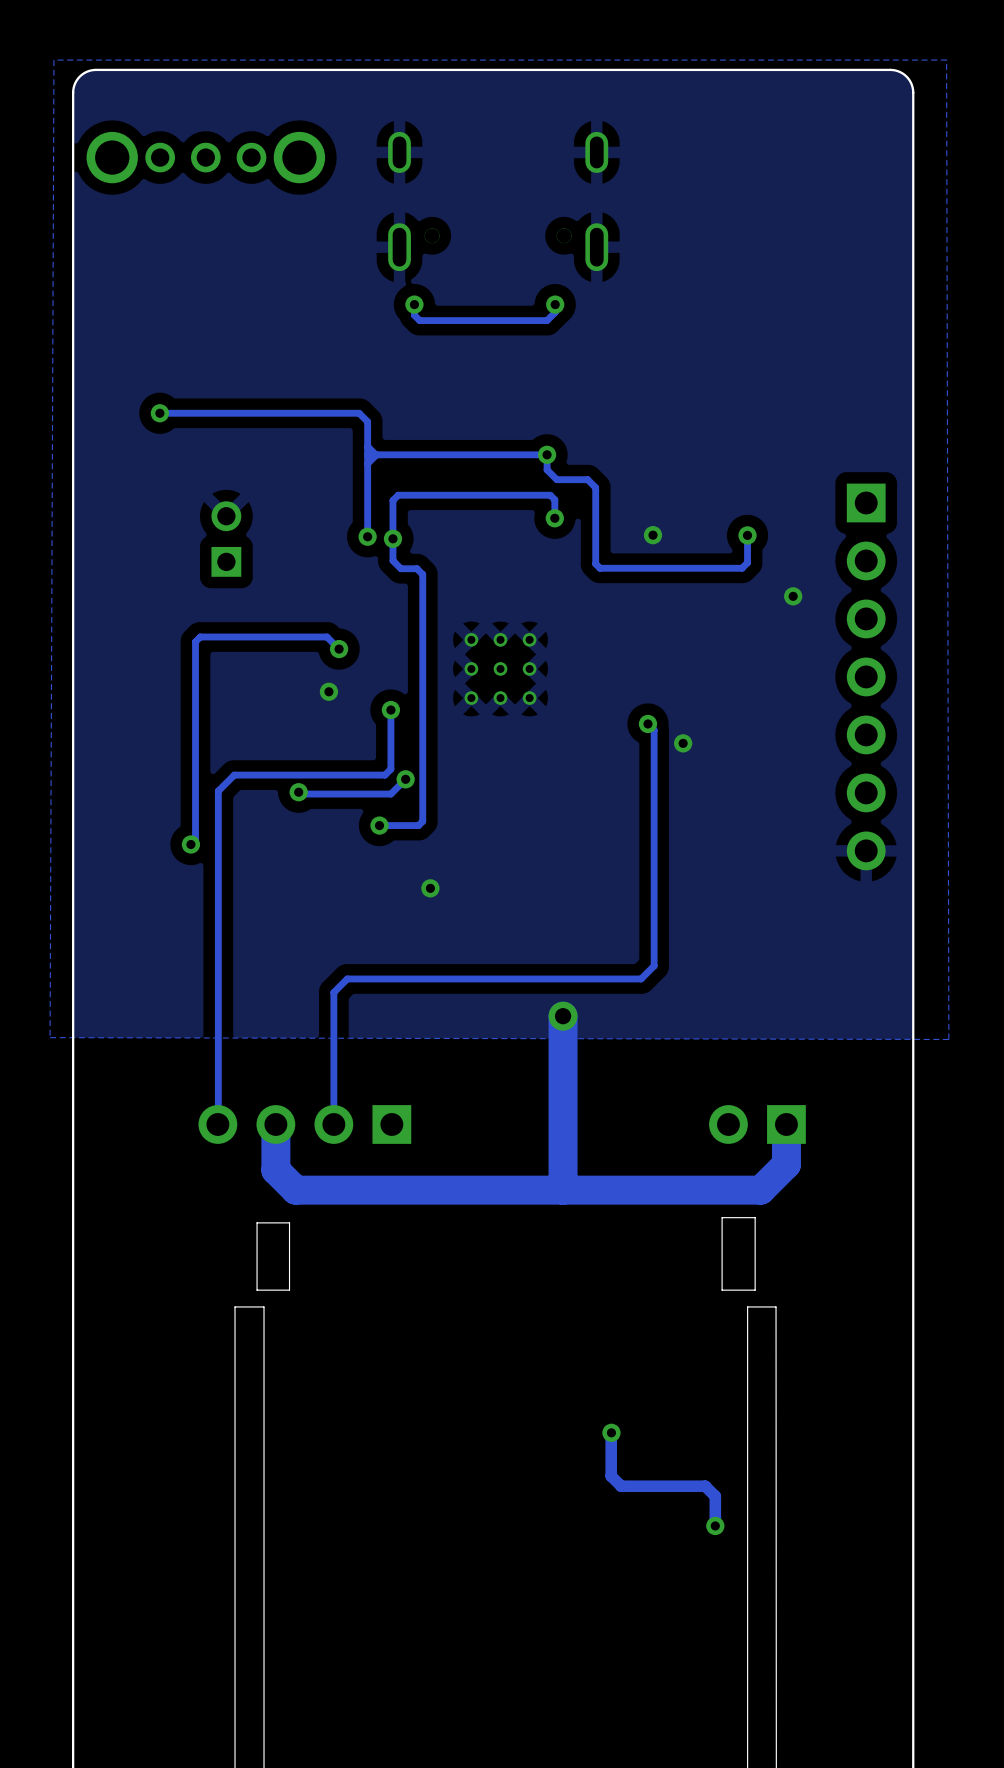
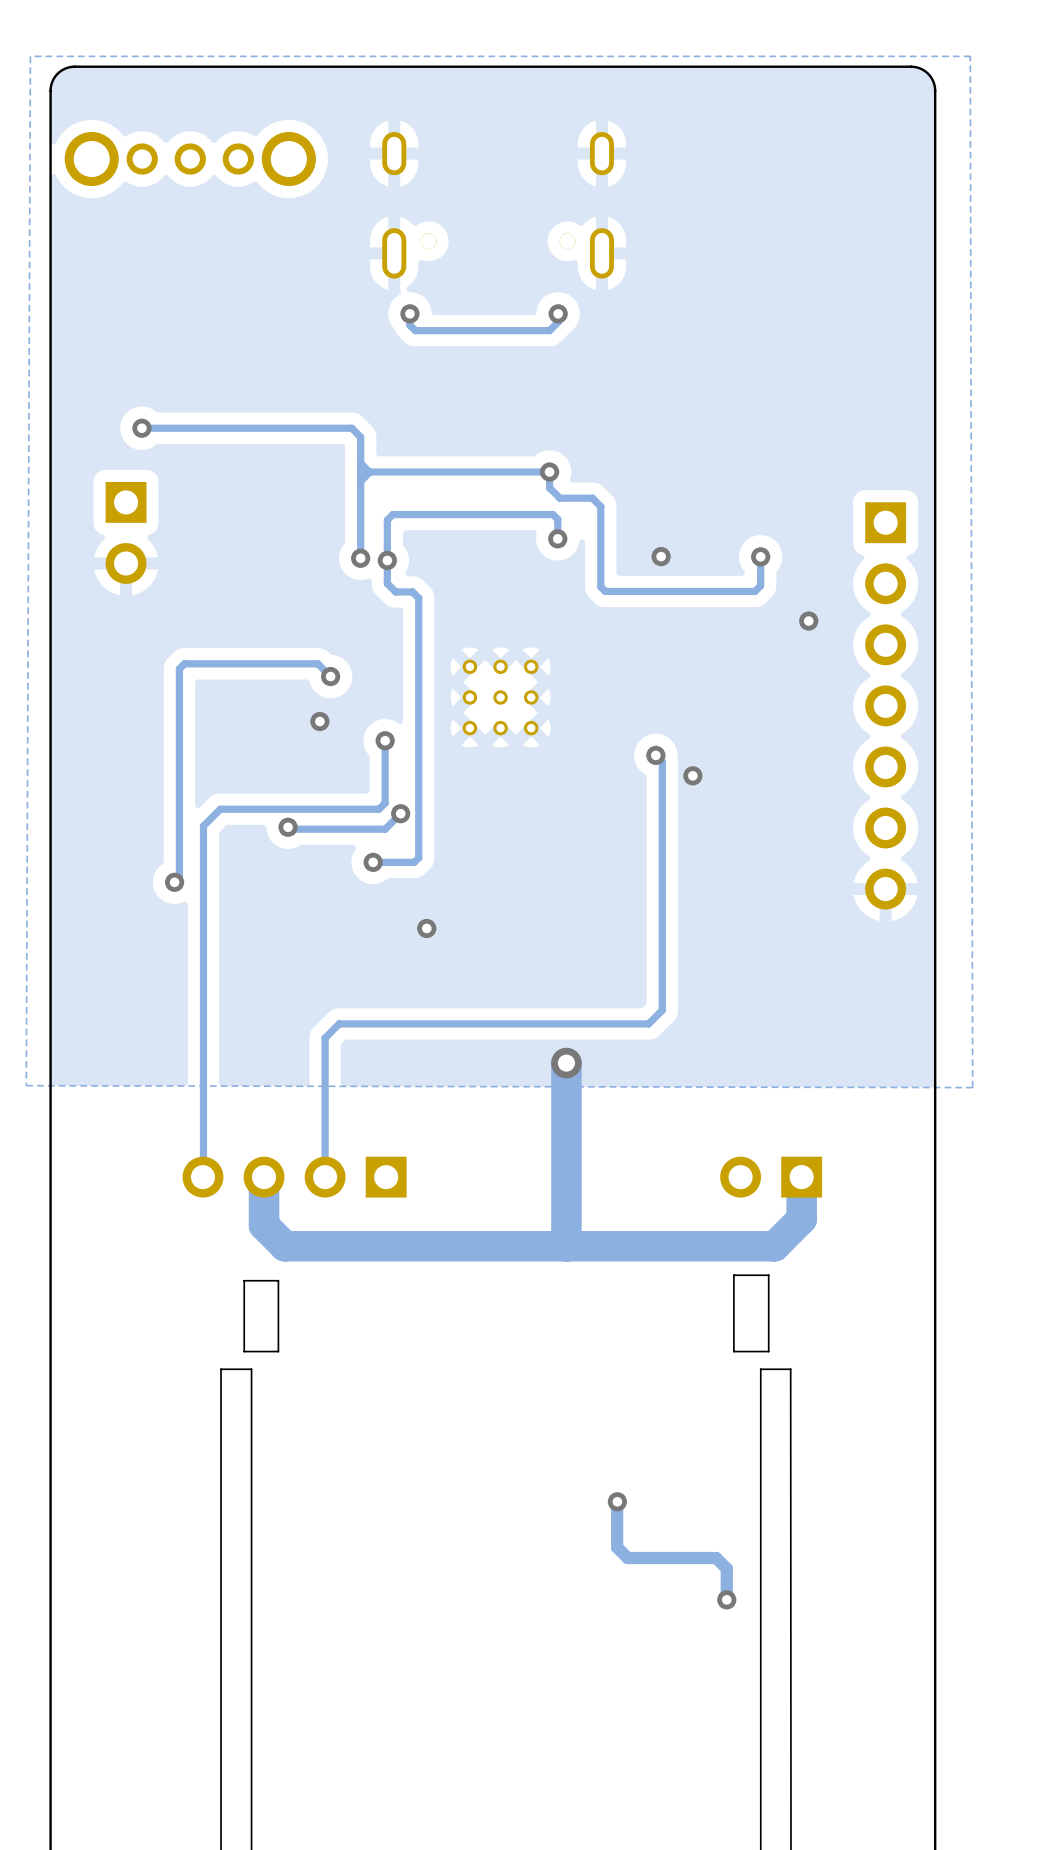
part: none -> (126, 532)
part: (226, 539) -> none

